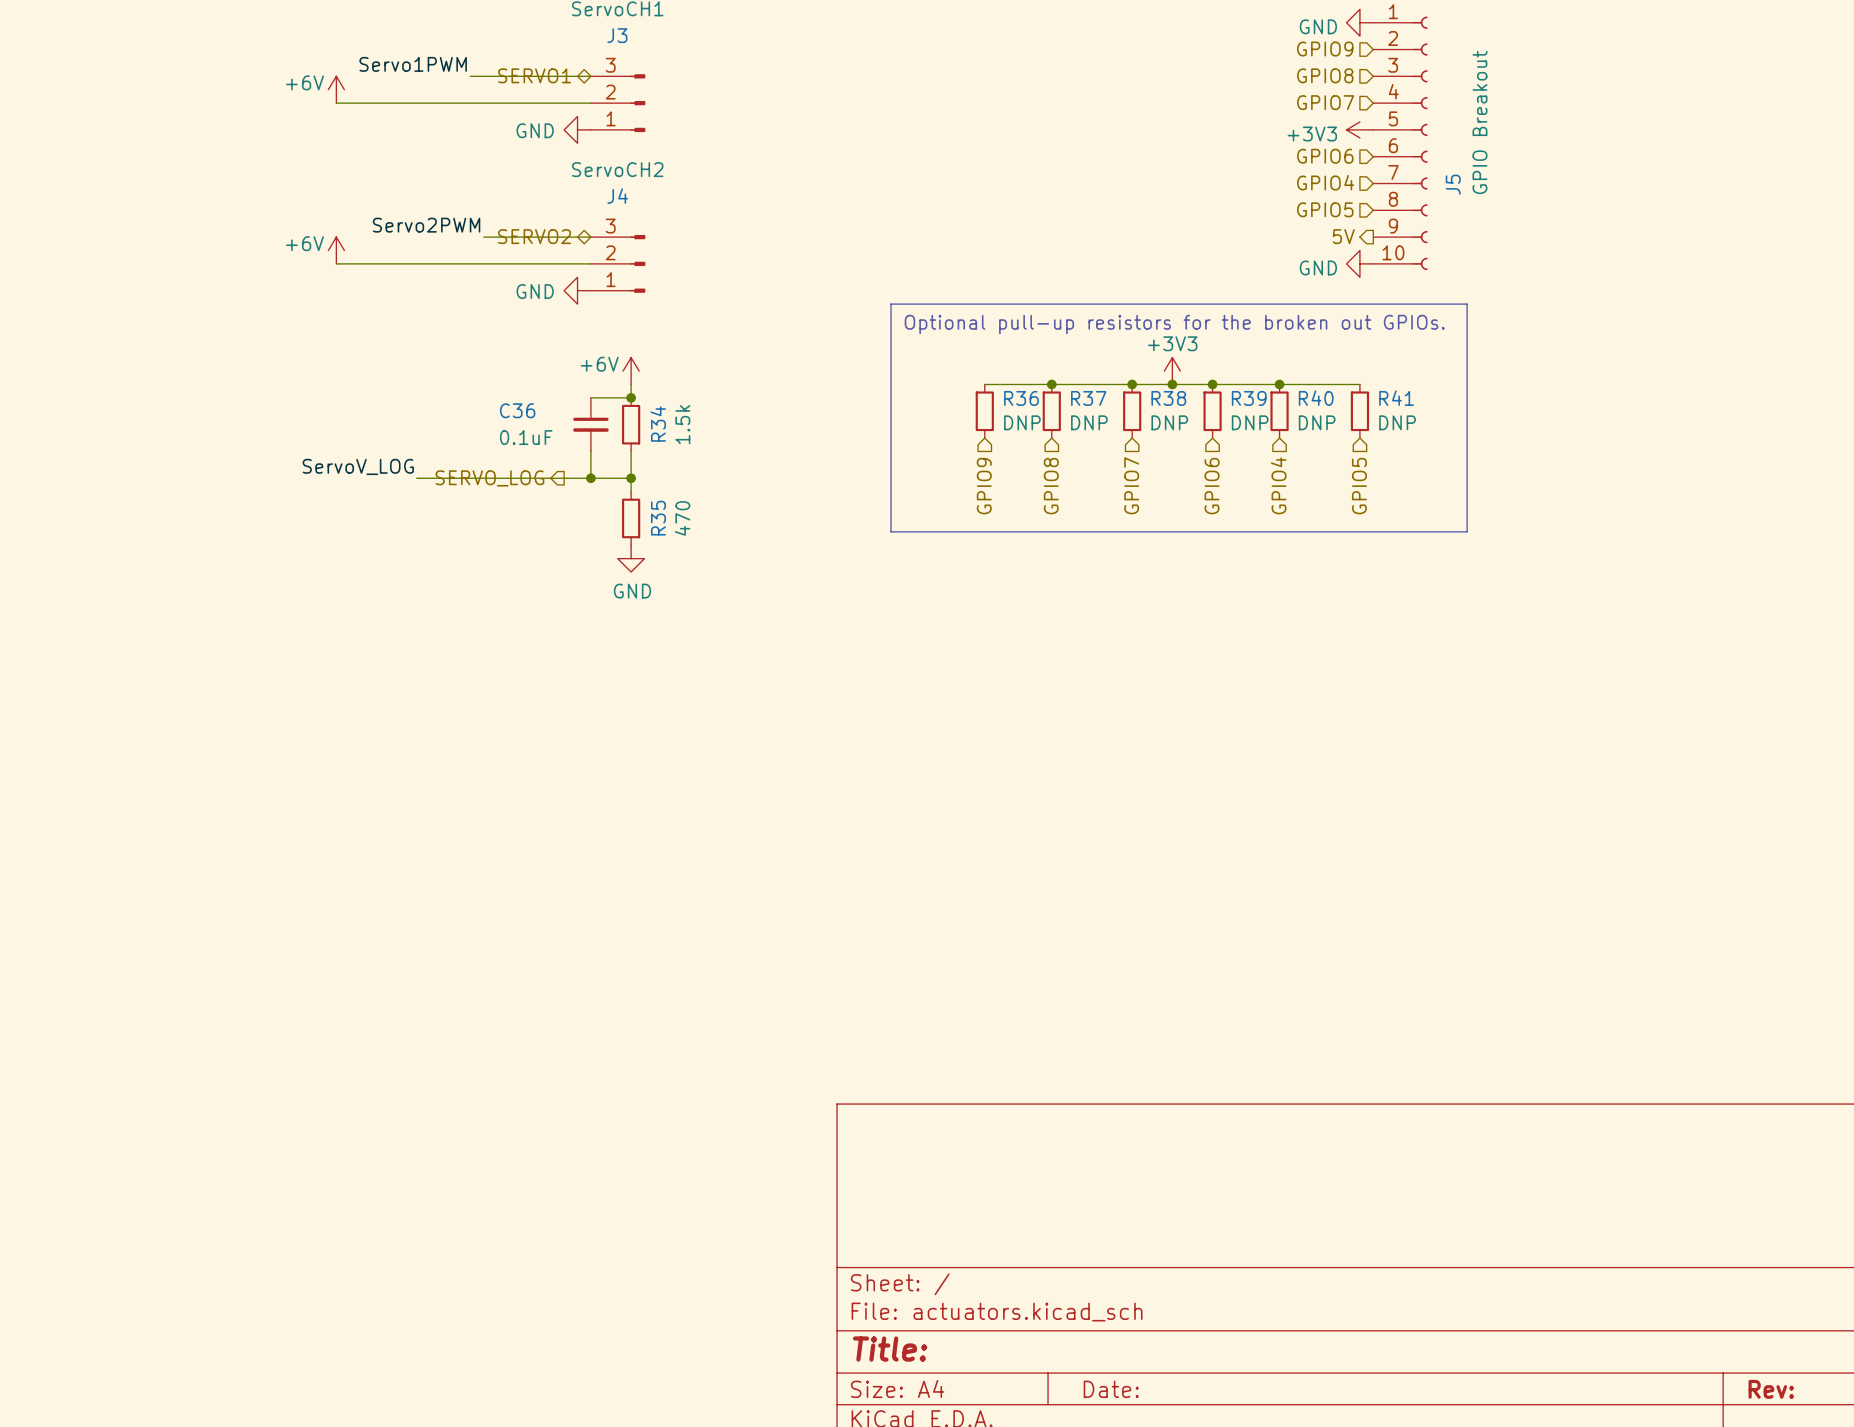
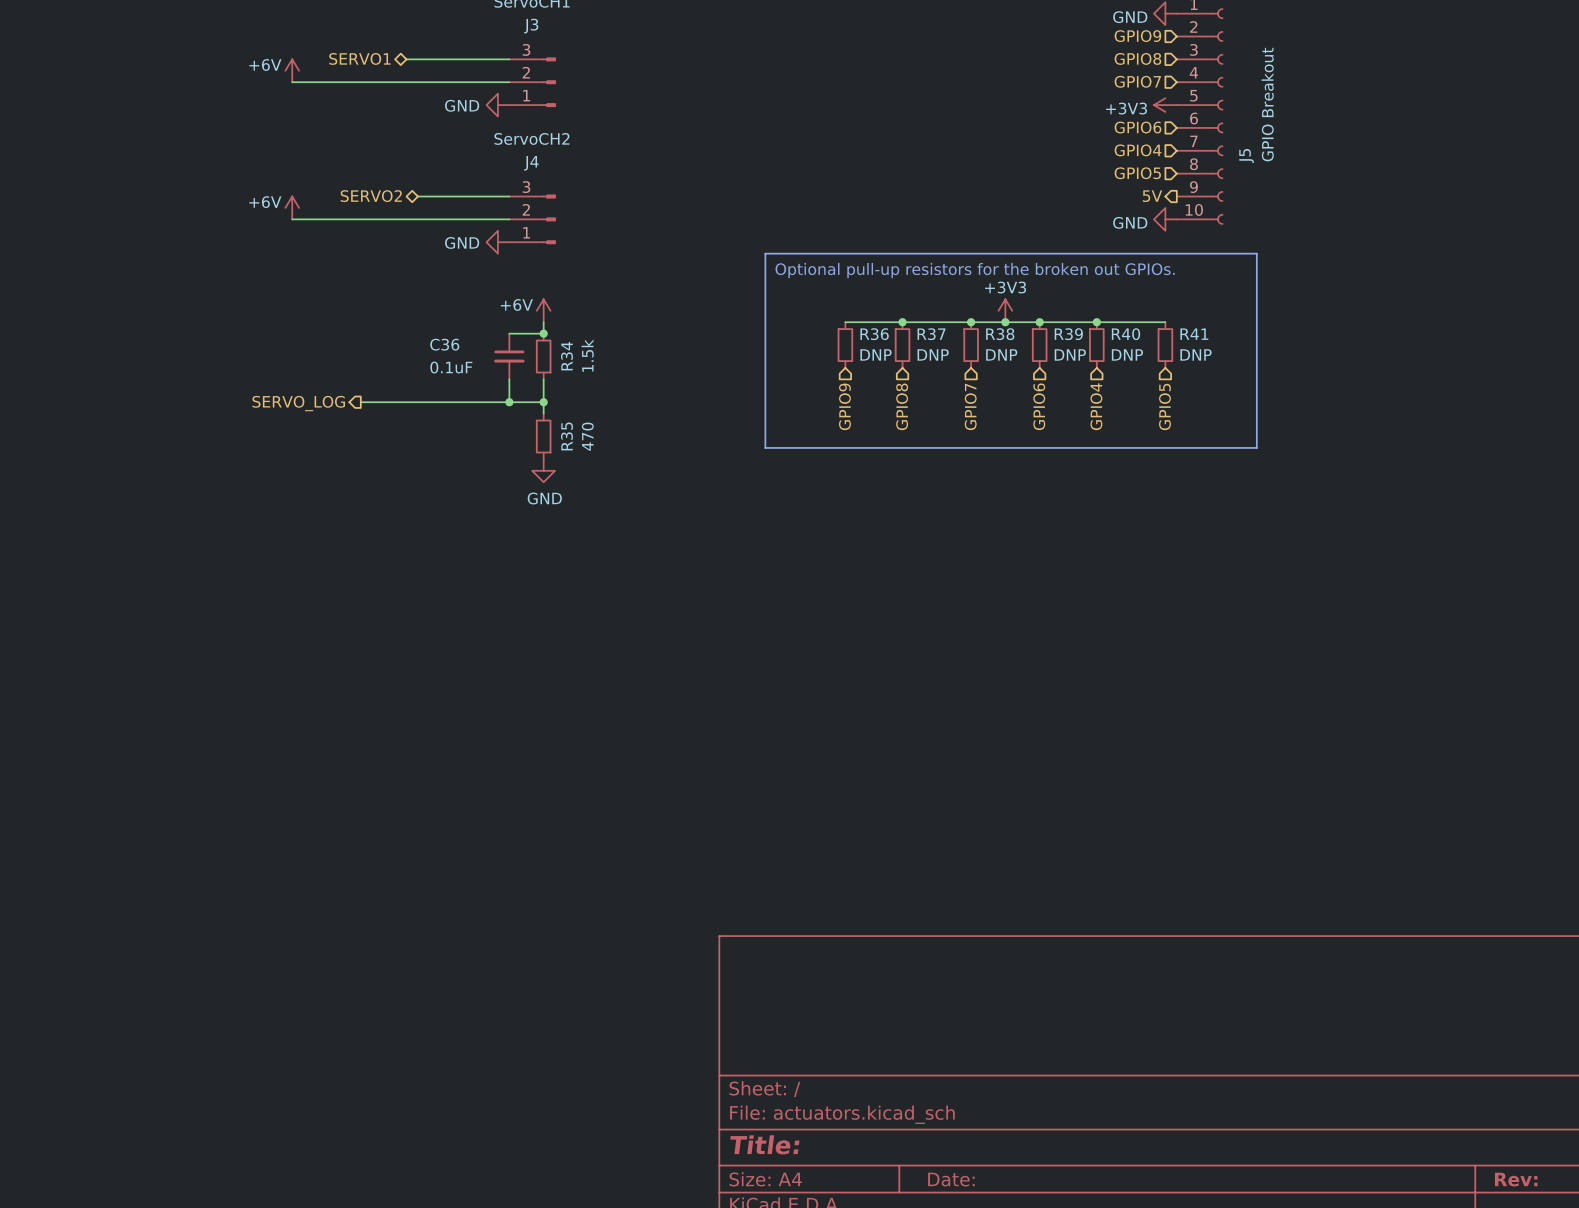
label: Servo1PWM (413, 64) -> none
hierarchical label position: SERVO1 (534, 75) -> SERVO1 (359, 58)
label: Servo2PWM (426, 225) -> none
hierarchical label position: SERVO2 (534, 236) -> SERVO2 (371, 196)
label: ServoV_LOG (358, 466) -> none
hierarchical label position: SERVO_LOG (489, 478) -> SERVO_LOG (298, 403)

